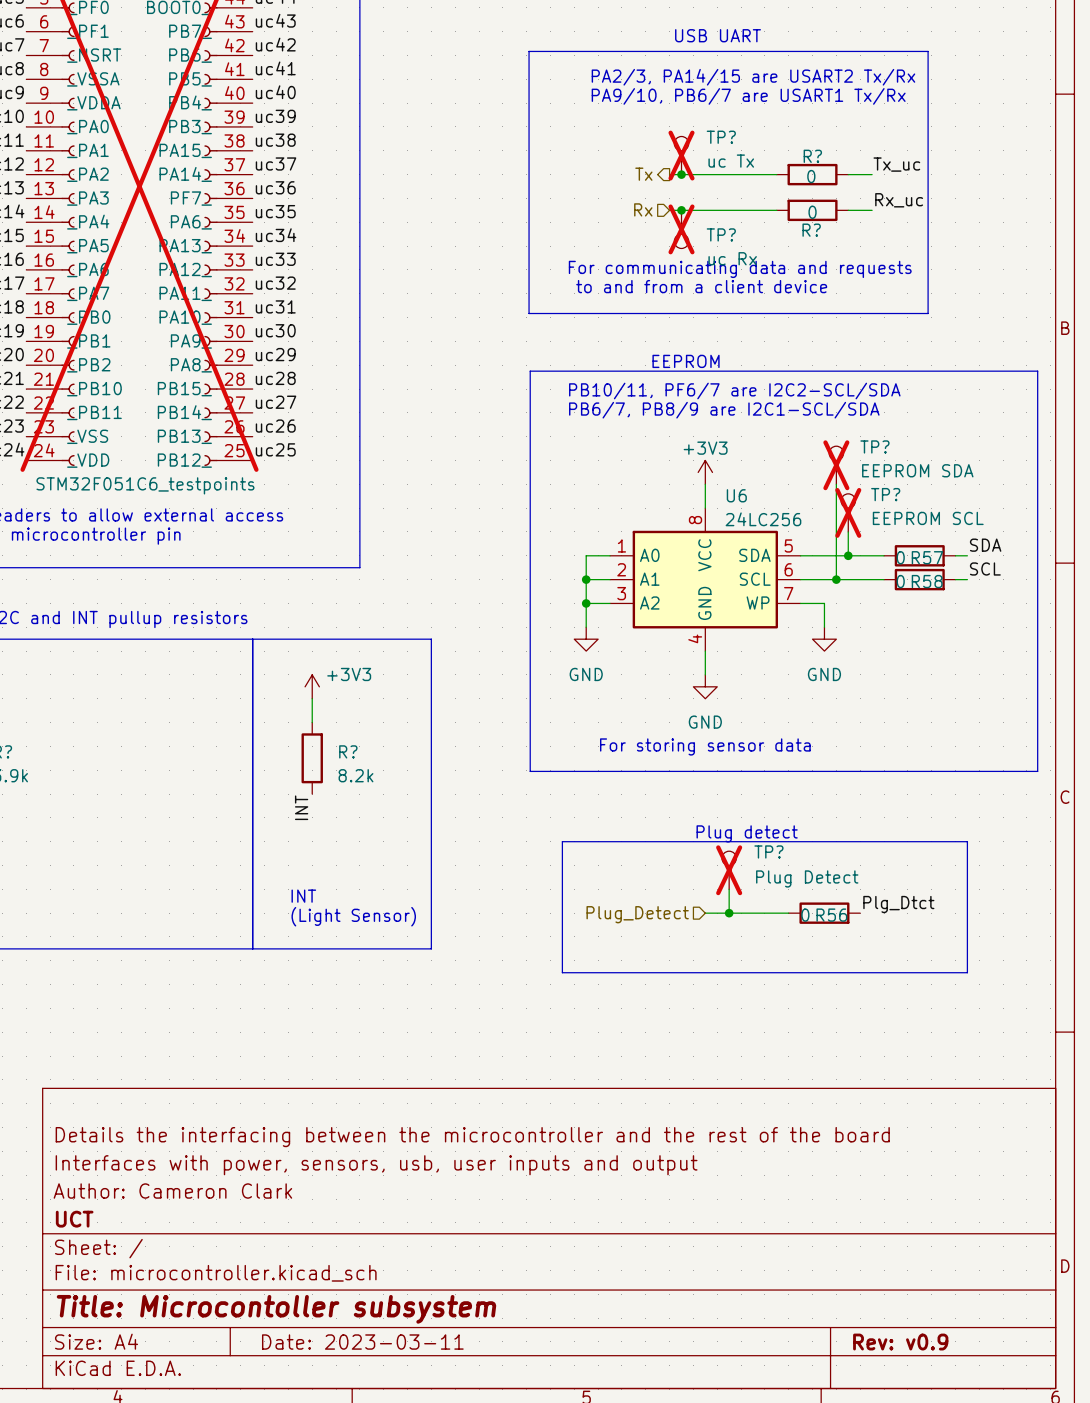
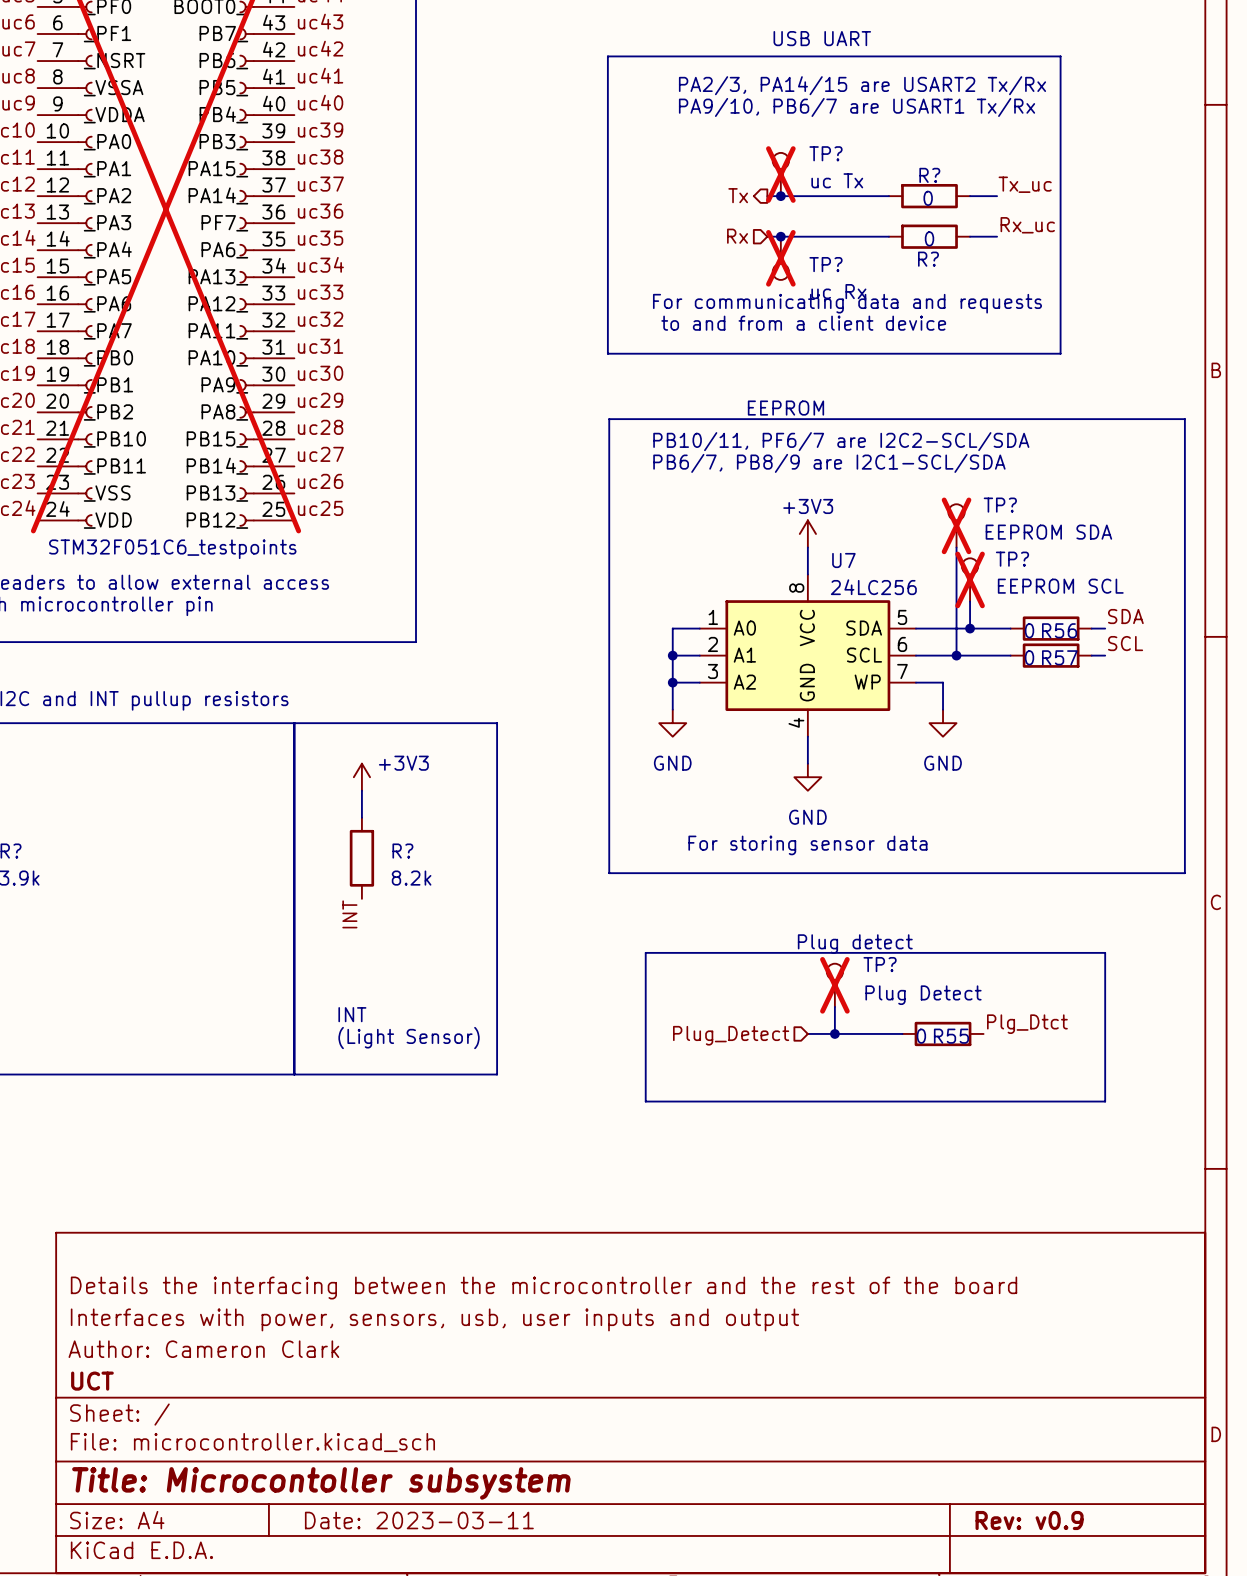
U6 name: U6 (736, 495) -> U7 (843, 560)
R57 name: R57 (927, 557) -> R56 (1059, 630)
R58 name: R58 (927, 581) -> R57 (1059, 657)
R56 name: R56 (831, 915) -> R55 (951, 1036)

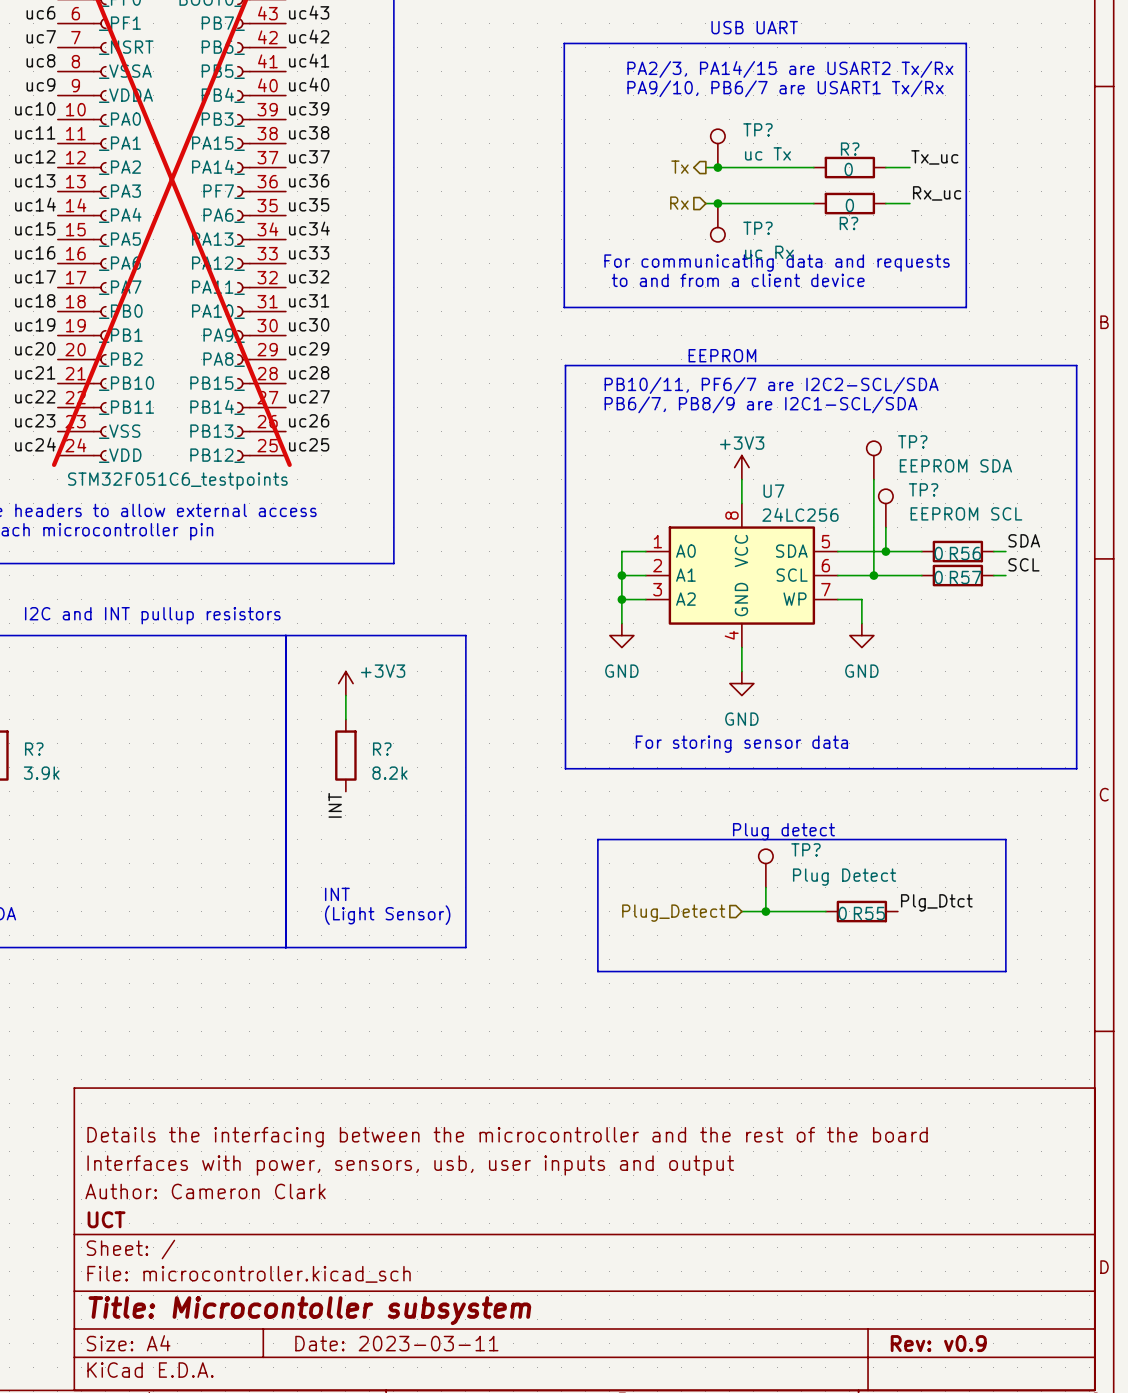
TP? do-not-place cross: (780, 174) -> none
TP? do-not-place cross: (780, 258) -> none
TP? do-not-place cross: (956, 525) -> none
TP? do-not-place cross: (970, 579) -> none
TP? do-not-place cross: (834, 985) -> none

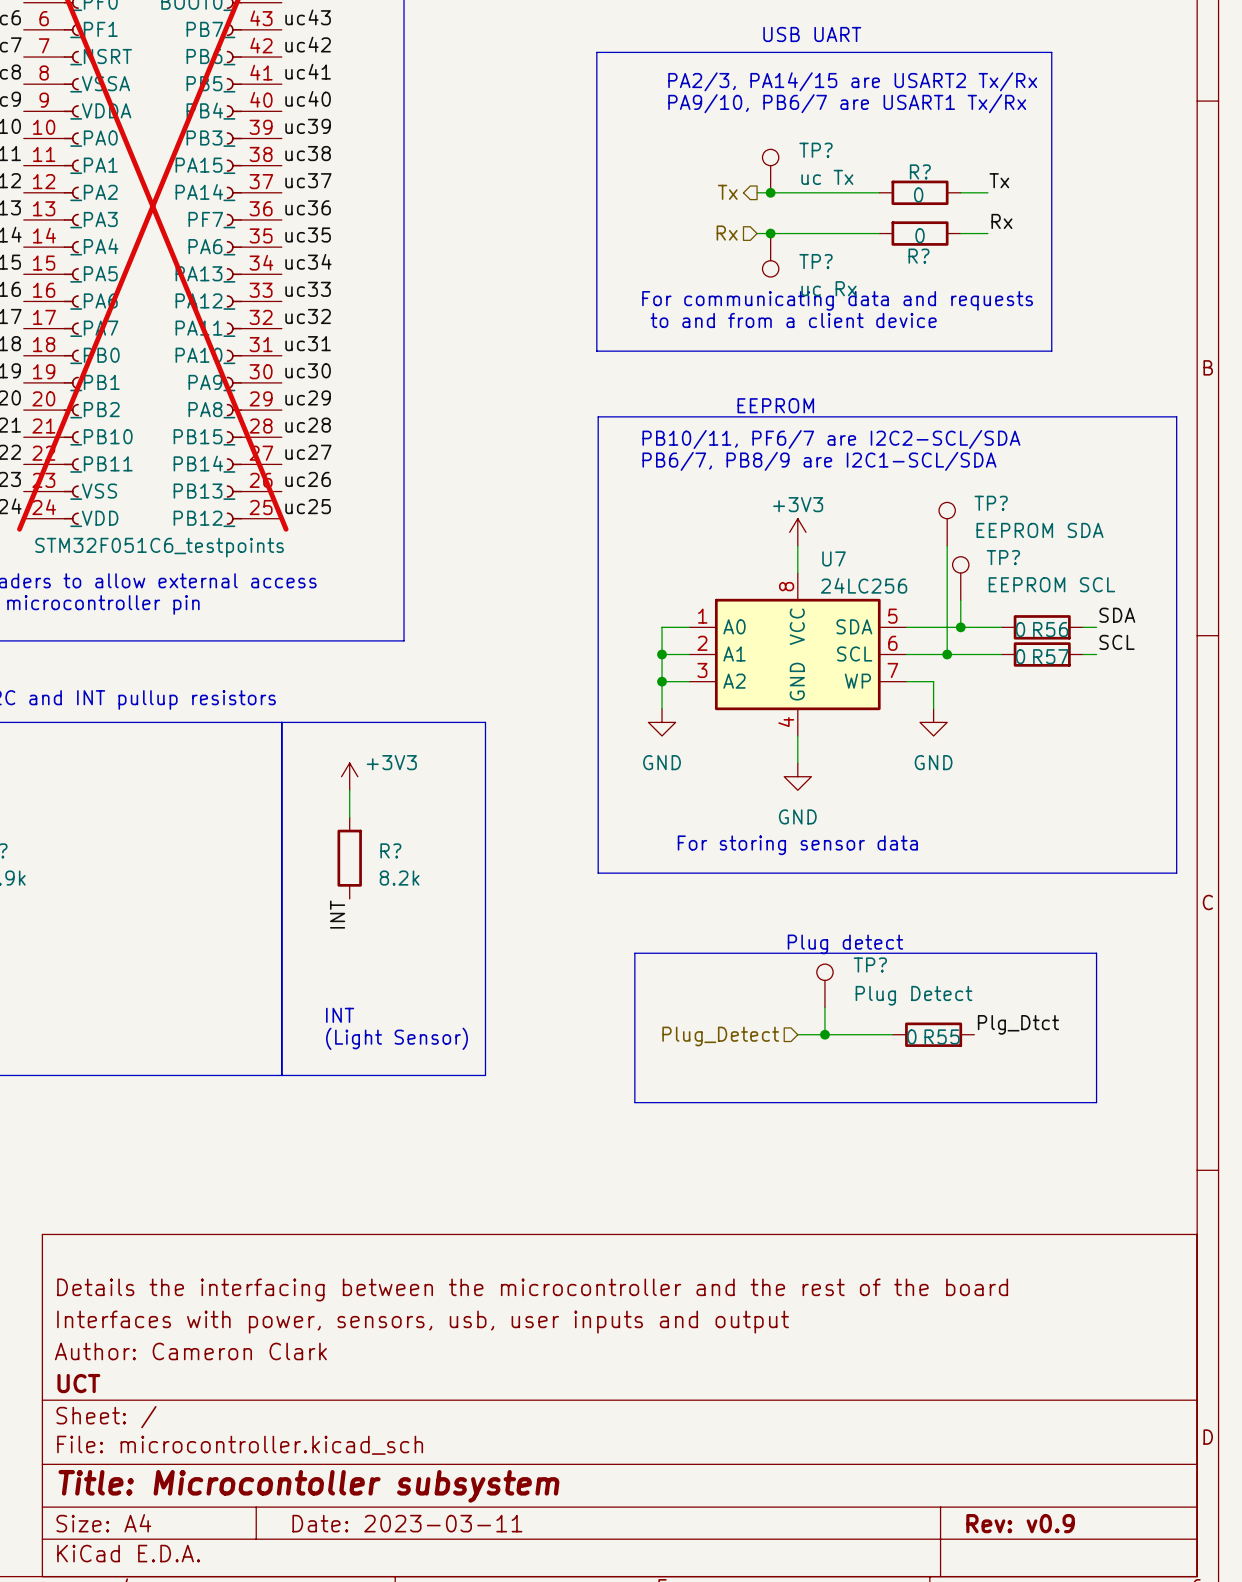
label: Tx_uc (934, 157) -> Tx (999, 180)
label: Rx_uc (937, 193) -> Rx (1001, 221)

